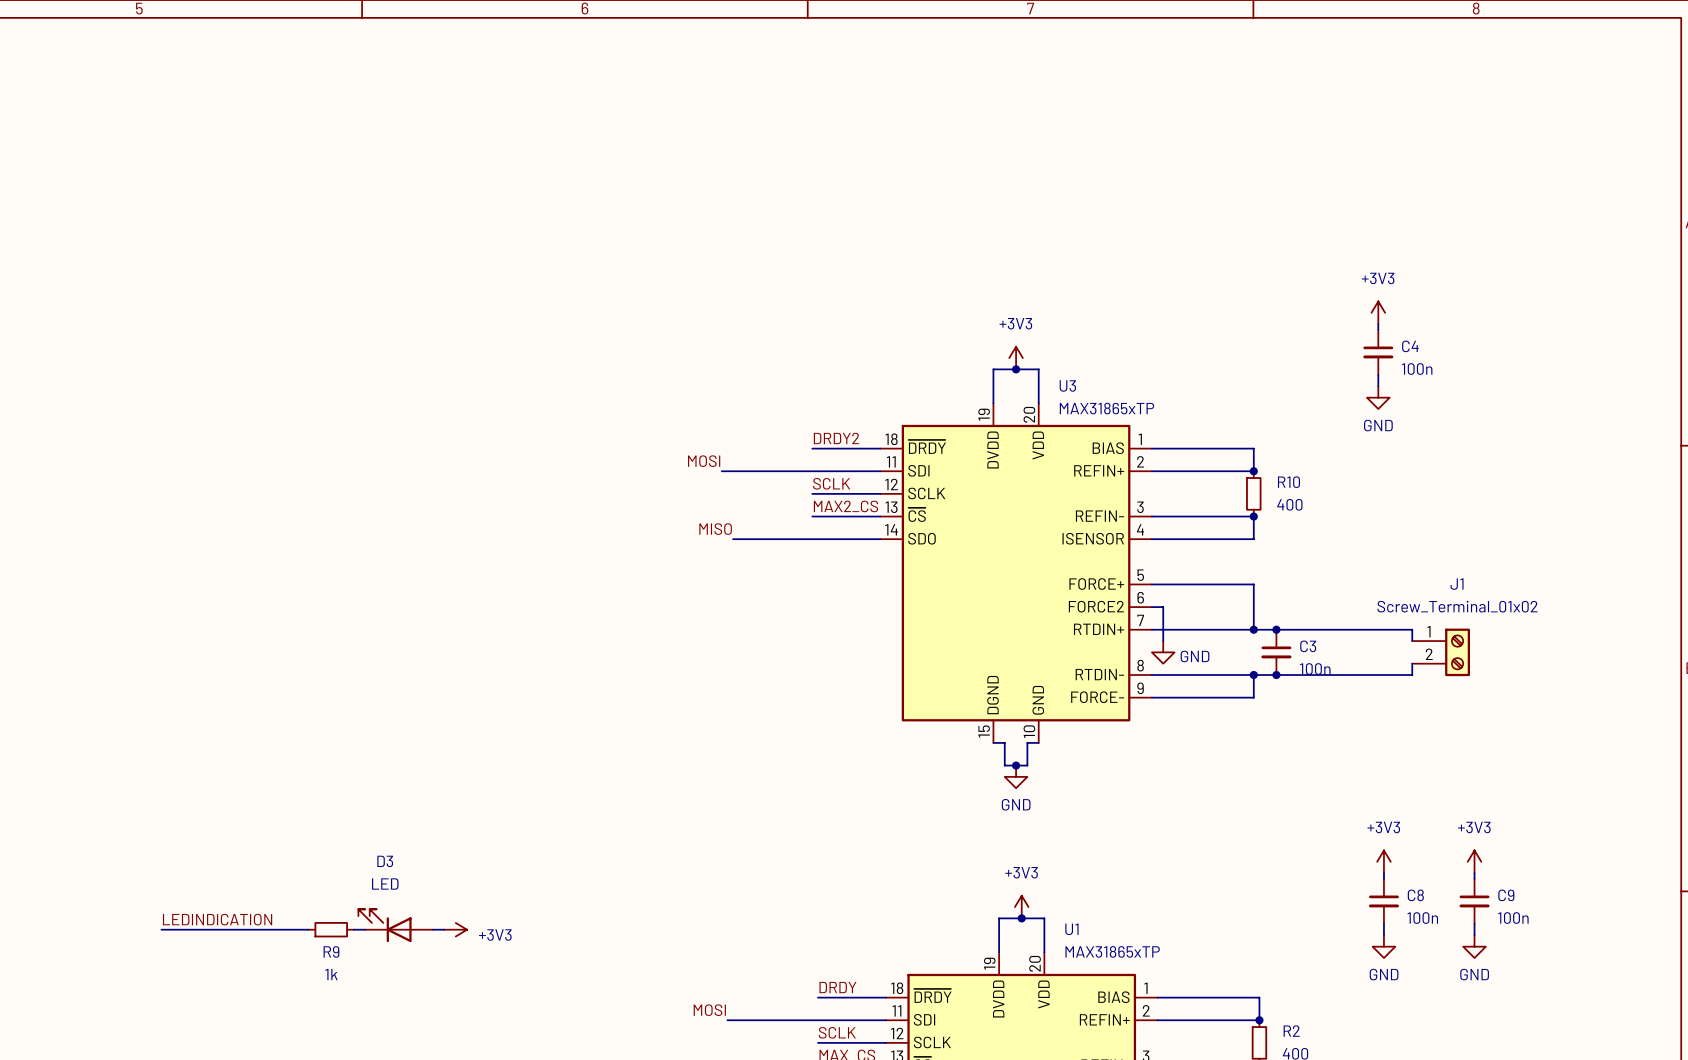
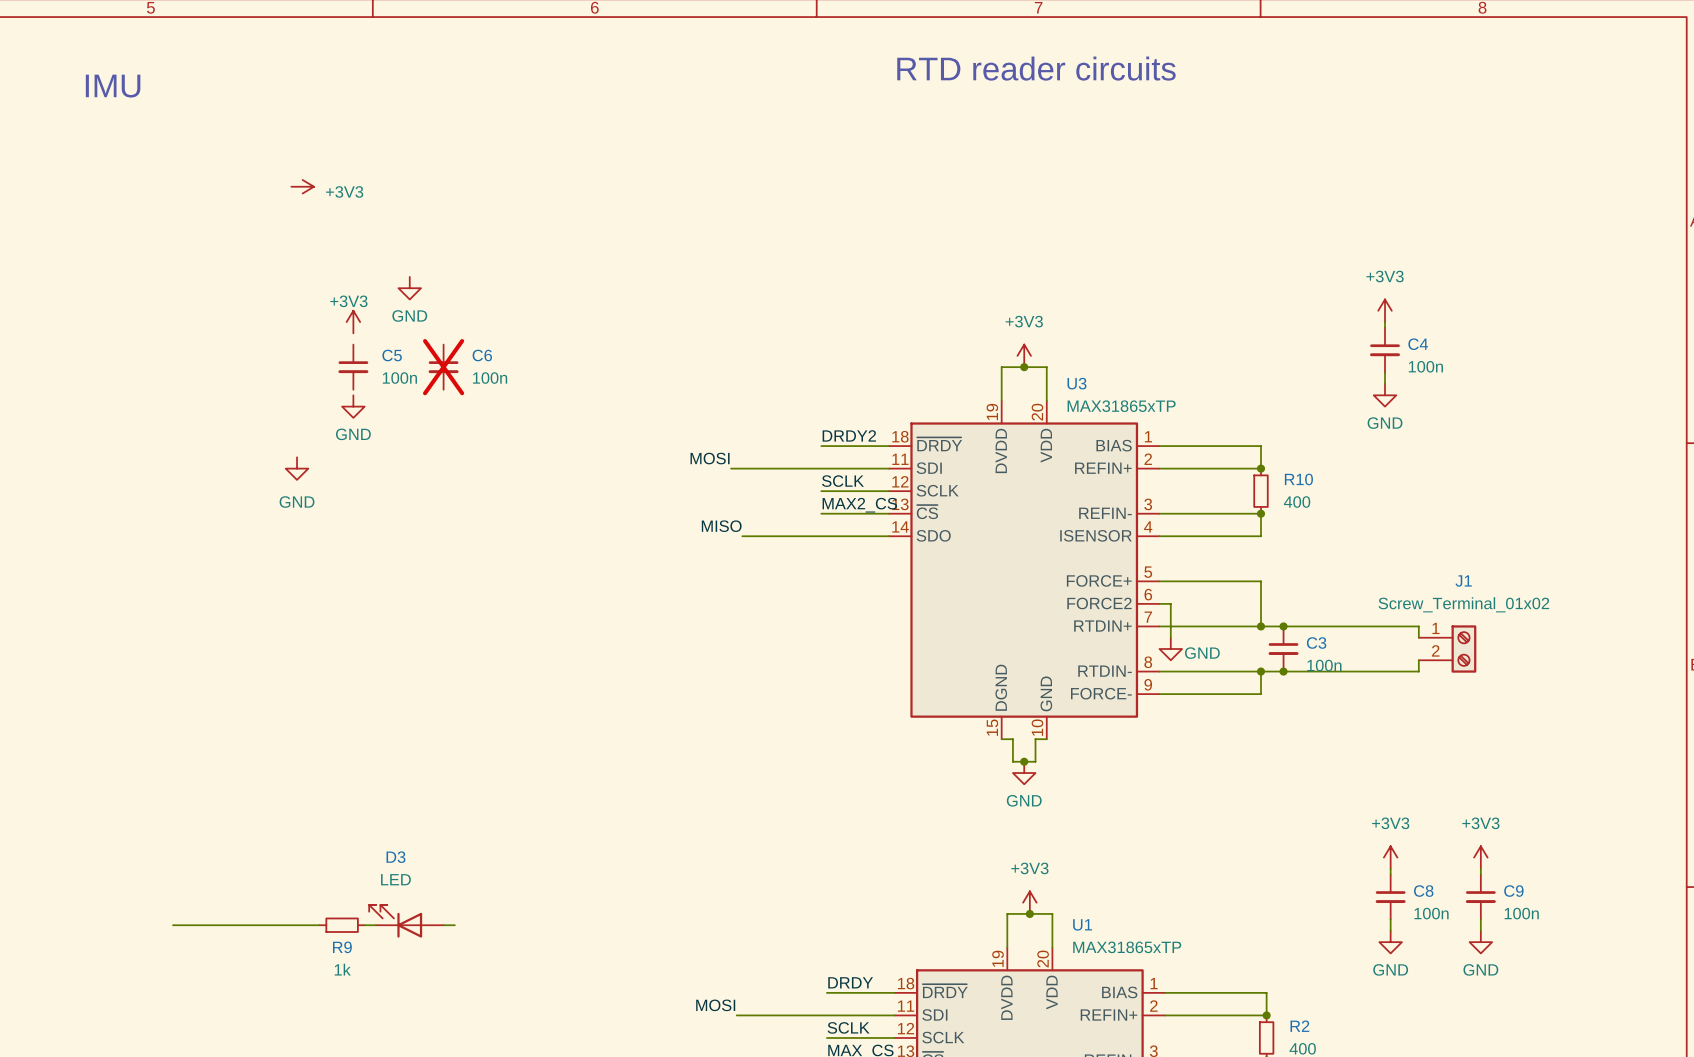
text: none -> RTD reader circuits (1036, 68)
text: none -> IMU (113, 86)
power symbol: none -> +3V3 (302, 186)
power symbol: none -> GND (409, 288)
power symbol: none -> +3V3 (353, 322)
C5: none -> 100n (353, 367)
C6: none -> 100n (443, 367)
power symbol: none -> GND (353, 406)
power symbol: none -> GND (297, 468)
label: LEDINDICATION (217, 919) -> none
power symbol: +3V3 (455, 929) -> none

